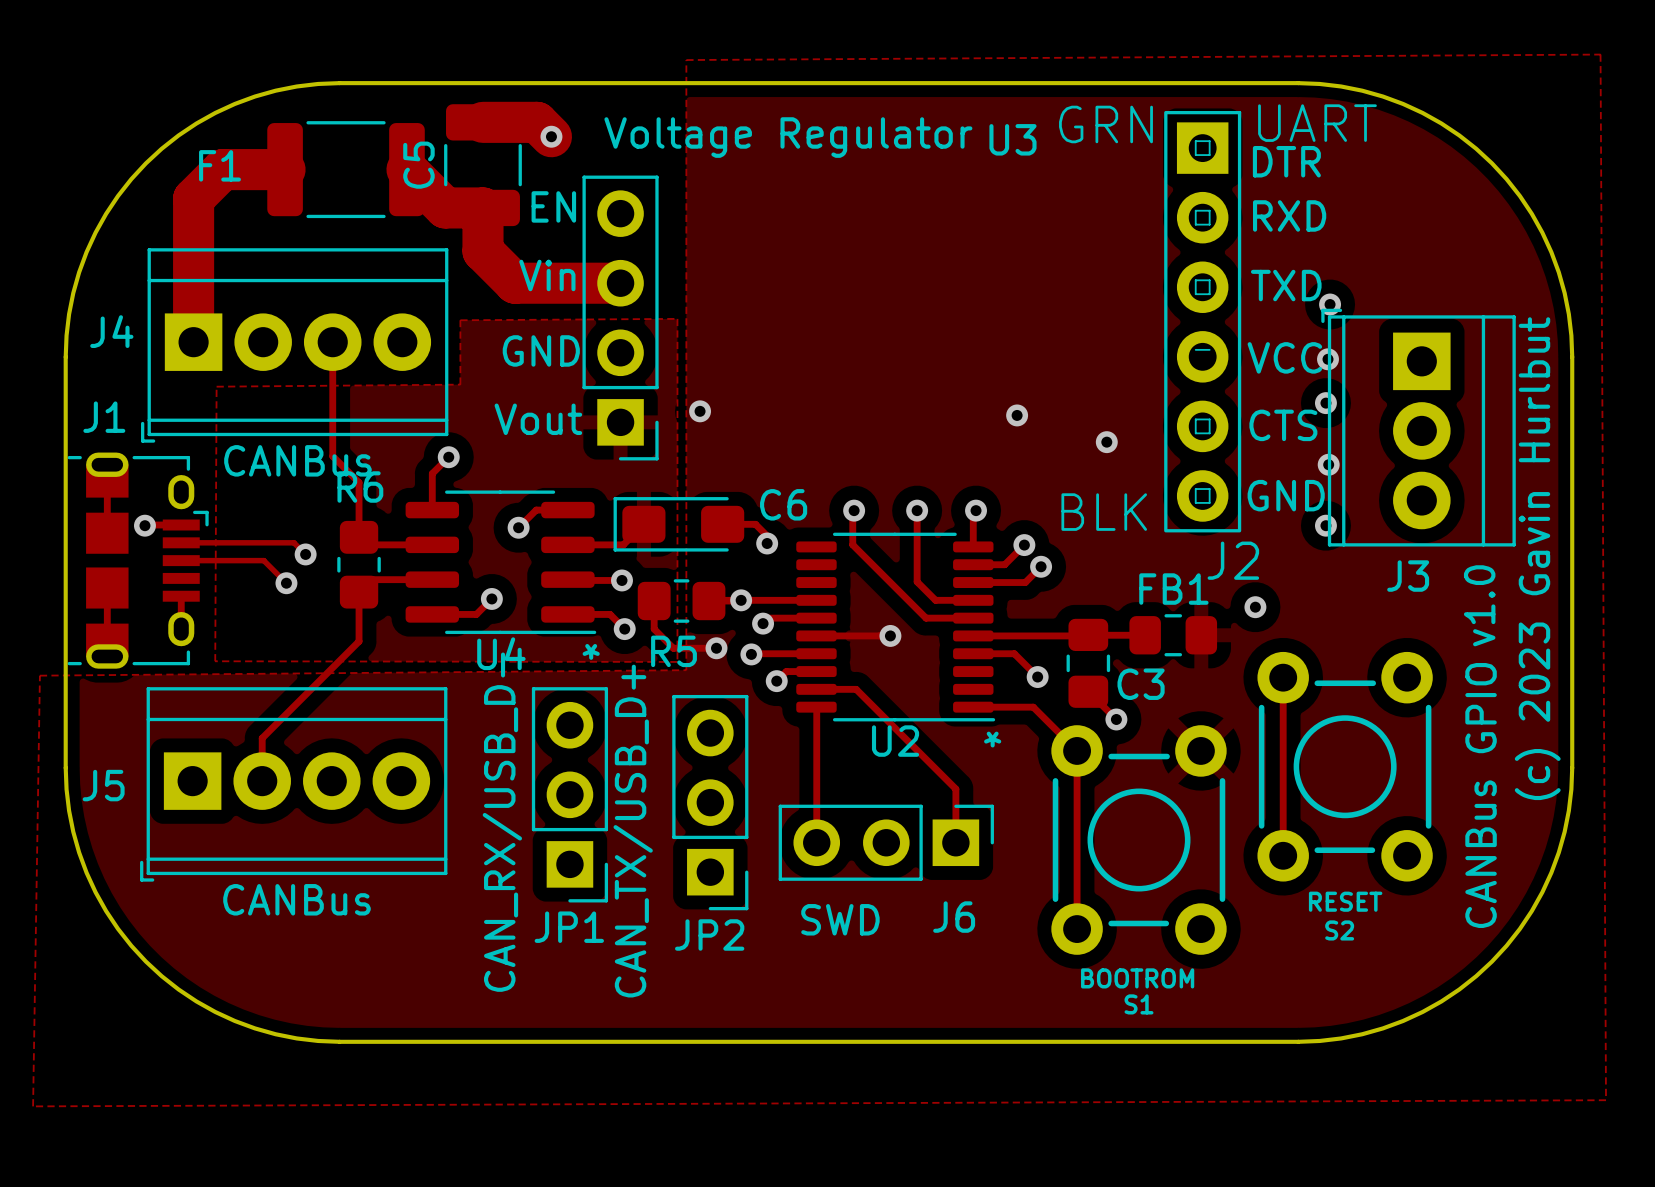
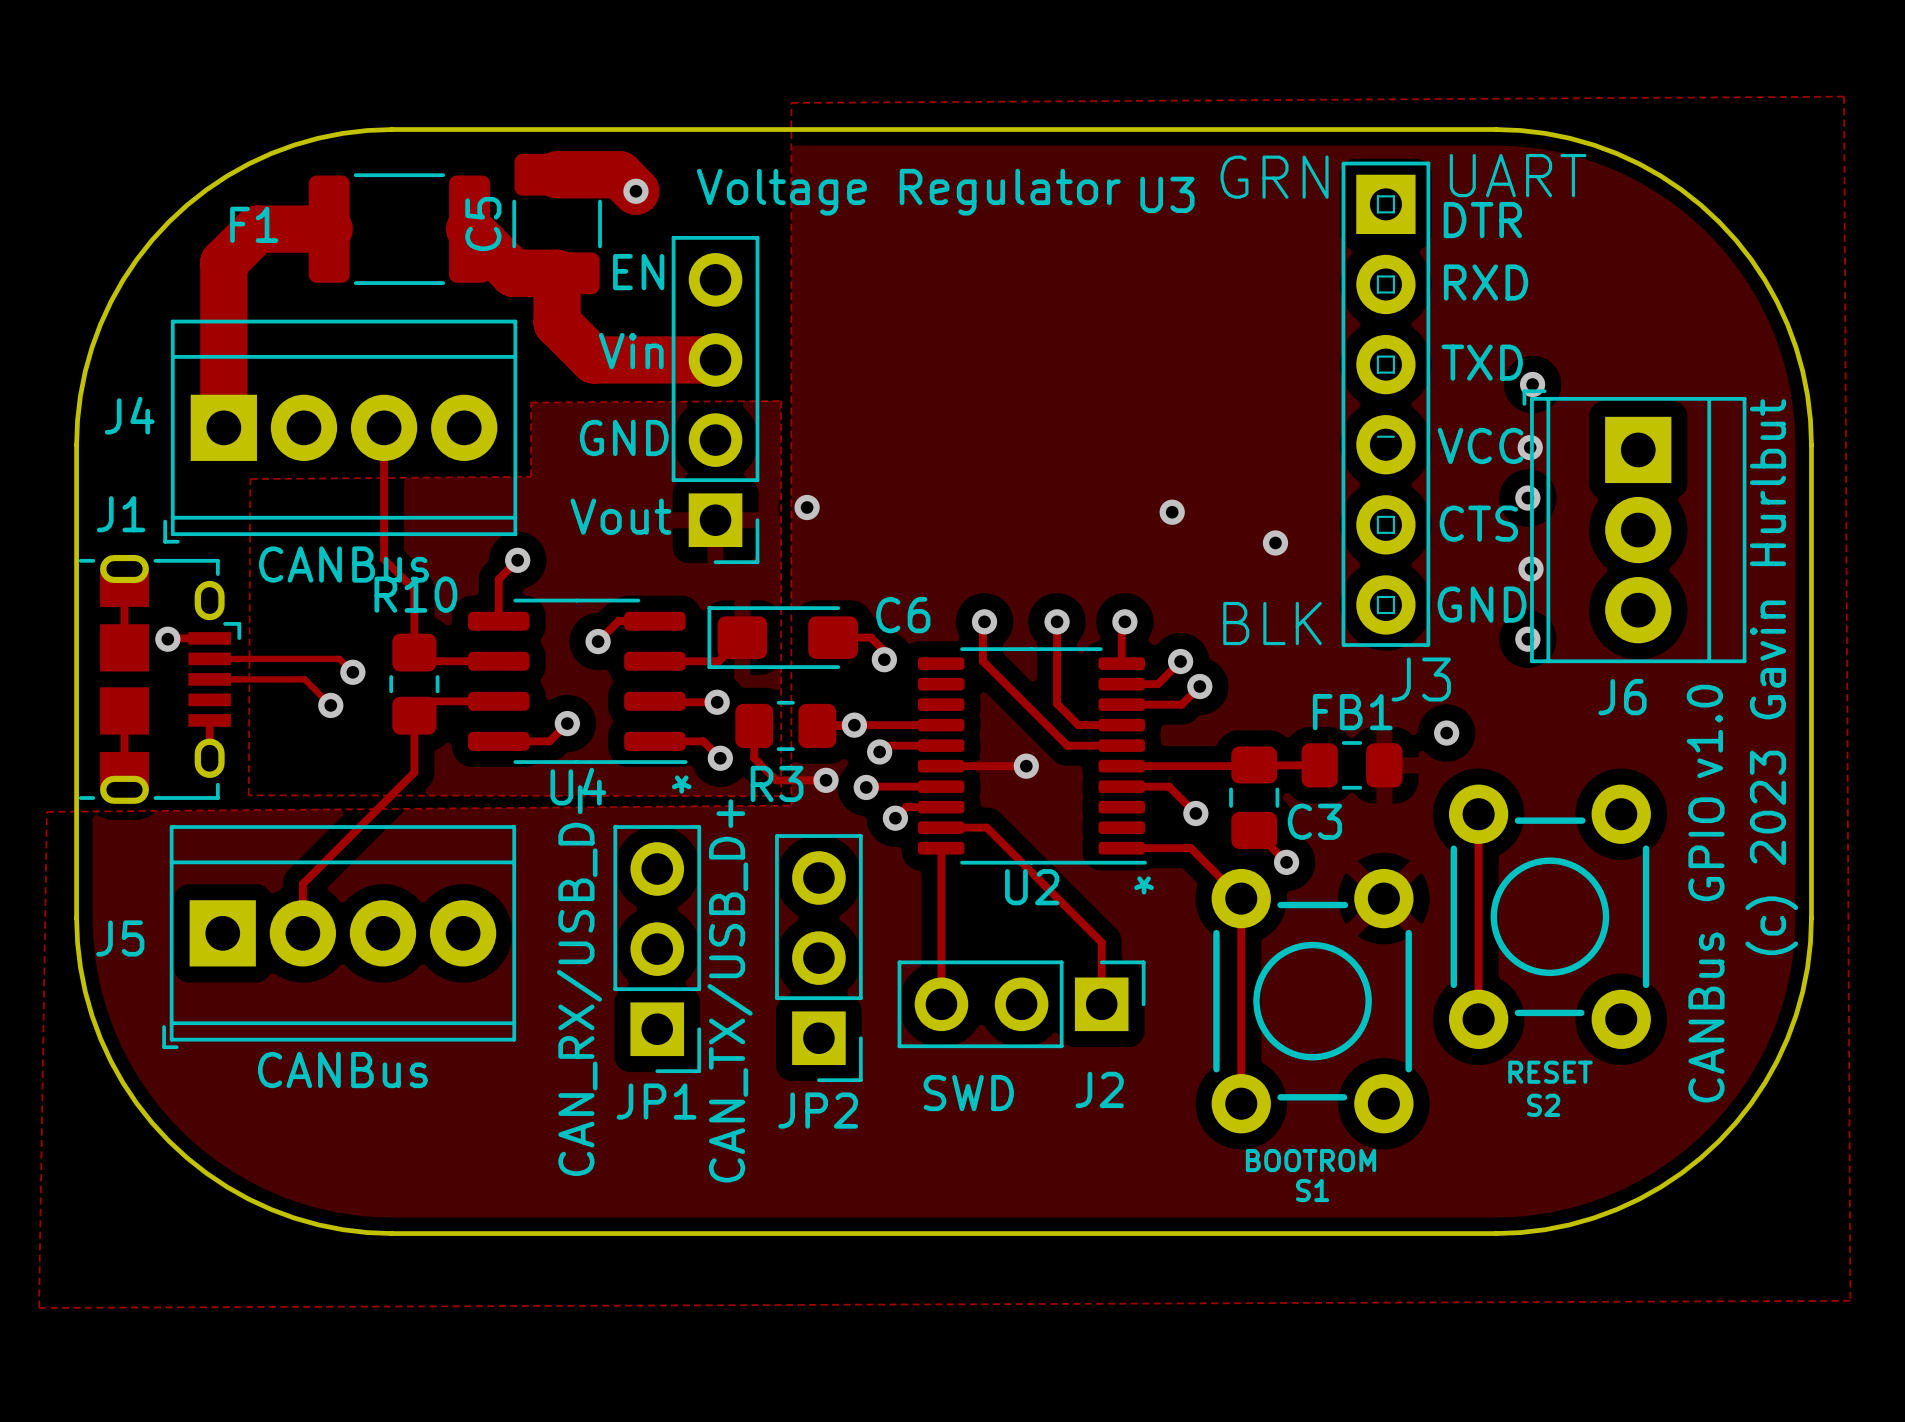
R6 name: R6 (360, 487) -> R10 (415, 594)
J2 name: J2 (1233, 560) -> J3 (1421, 679)
J3 name: J3 (1408, 576) -> J6 (1622, 697)
R5 name: R5 (674, 651) -> R3 (777, 783)
J6 name: J6 (954, 917) -> J2 (1099, 1089)

